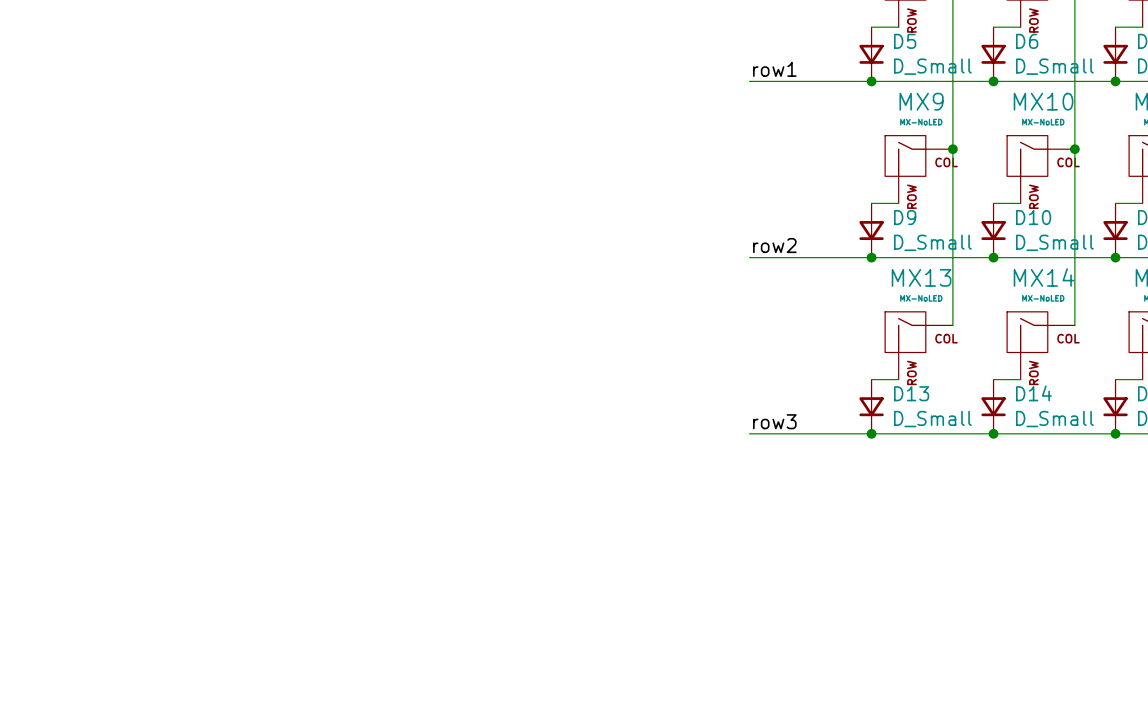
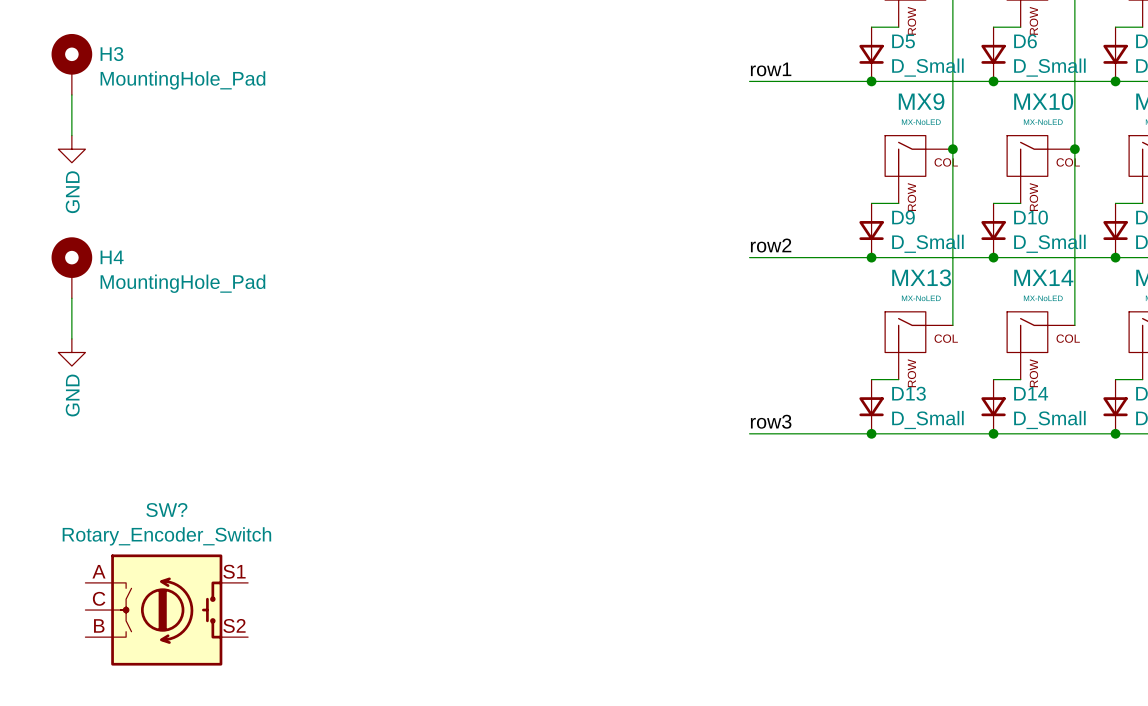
H3: none -> MountingHole_Pad (71, 64)
wire: none -> (71, 94) (71, 135)
power symbol: none -> GND (71, 149)
H4: none -> MountingHole_Pad (71, 267)
wire: none -> (71, 298) (71, 338)
power symbol: none -> GND (71, 352)
SW?: none -> Rotary_Encoder_Switch (166, 610)

